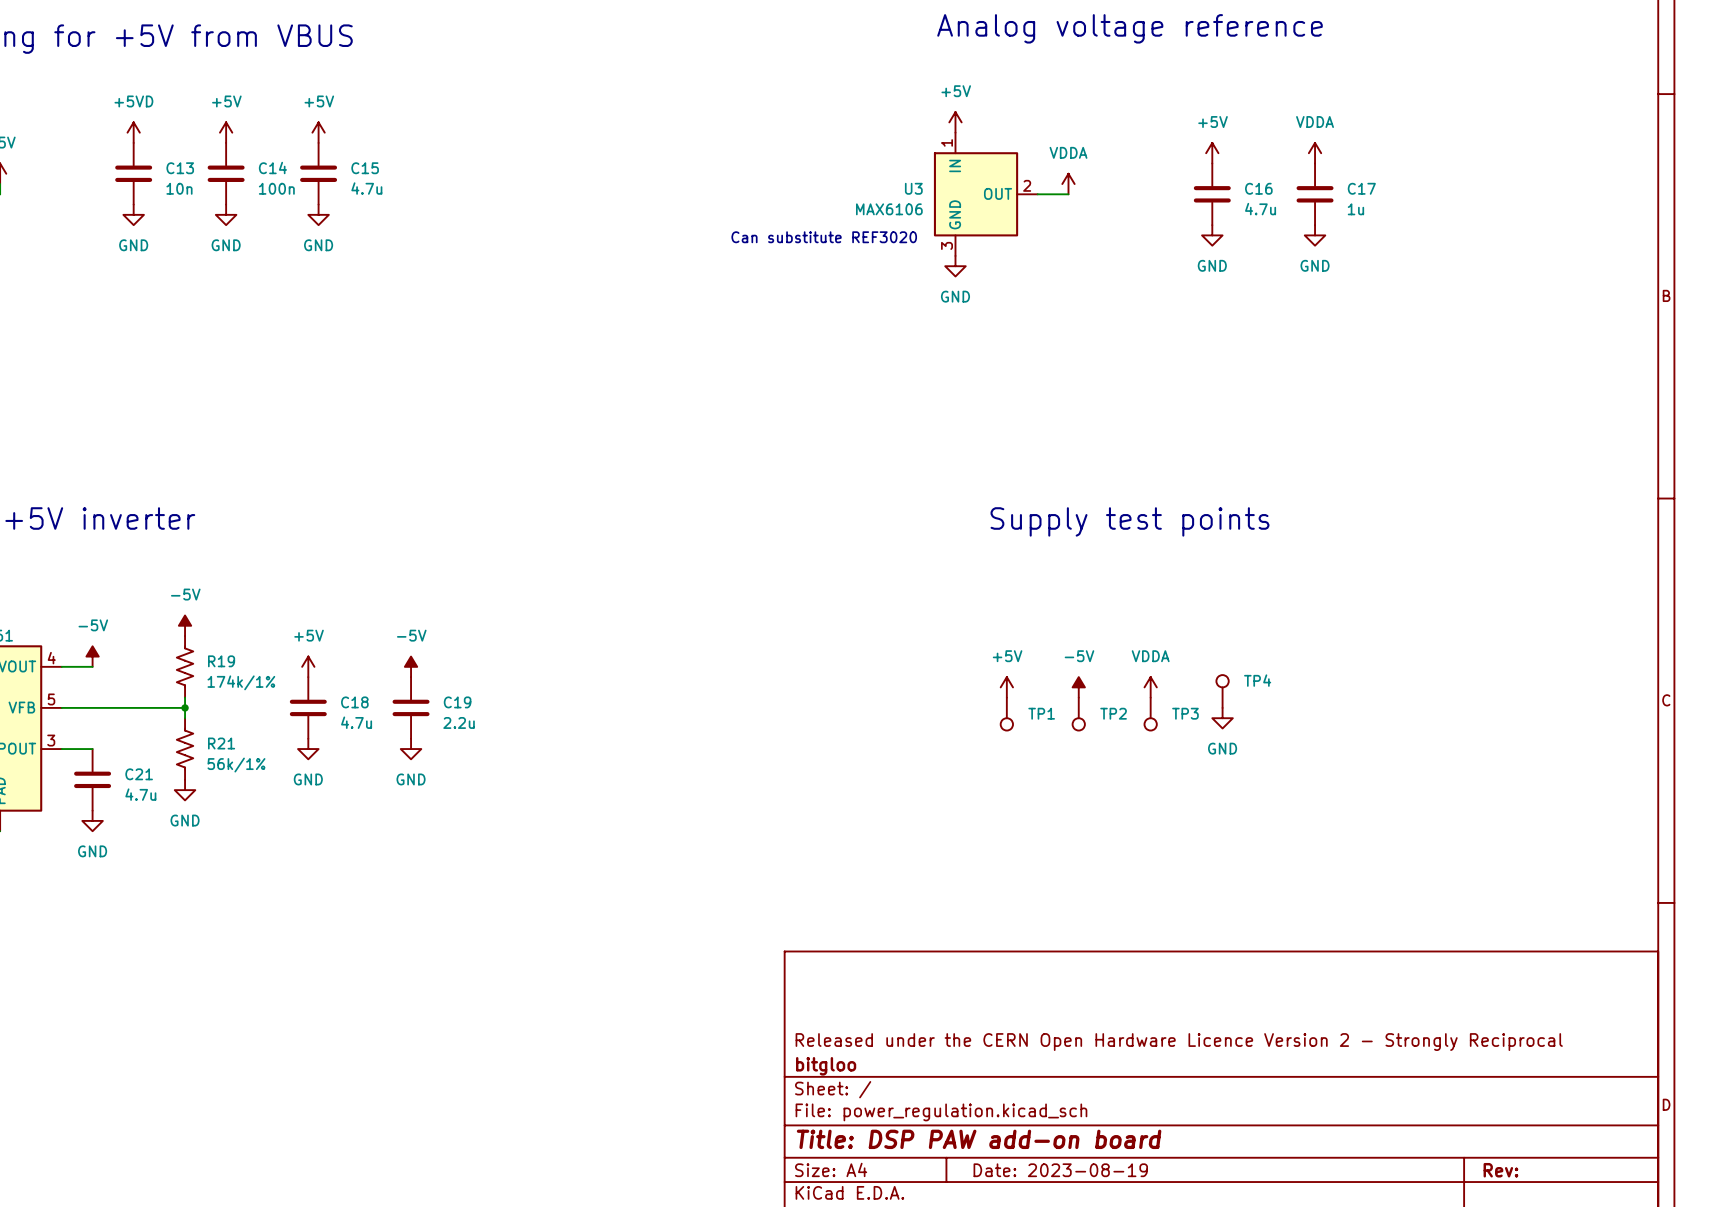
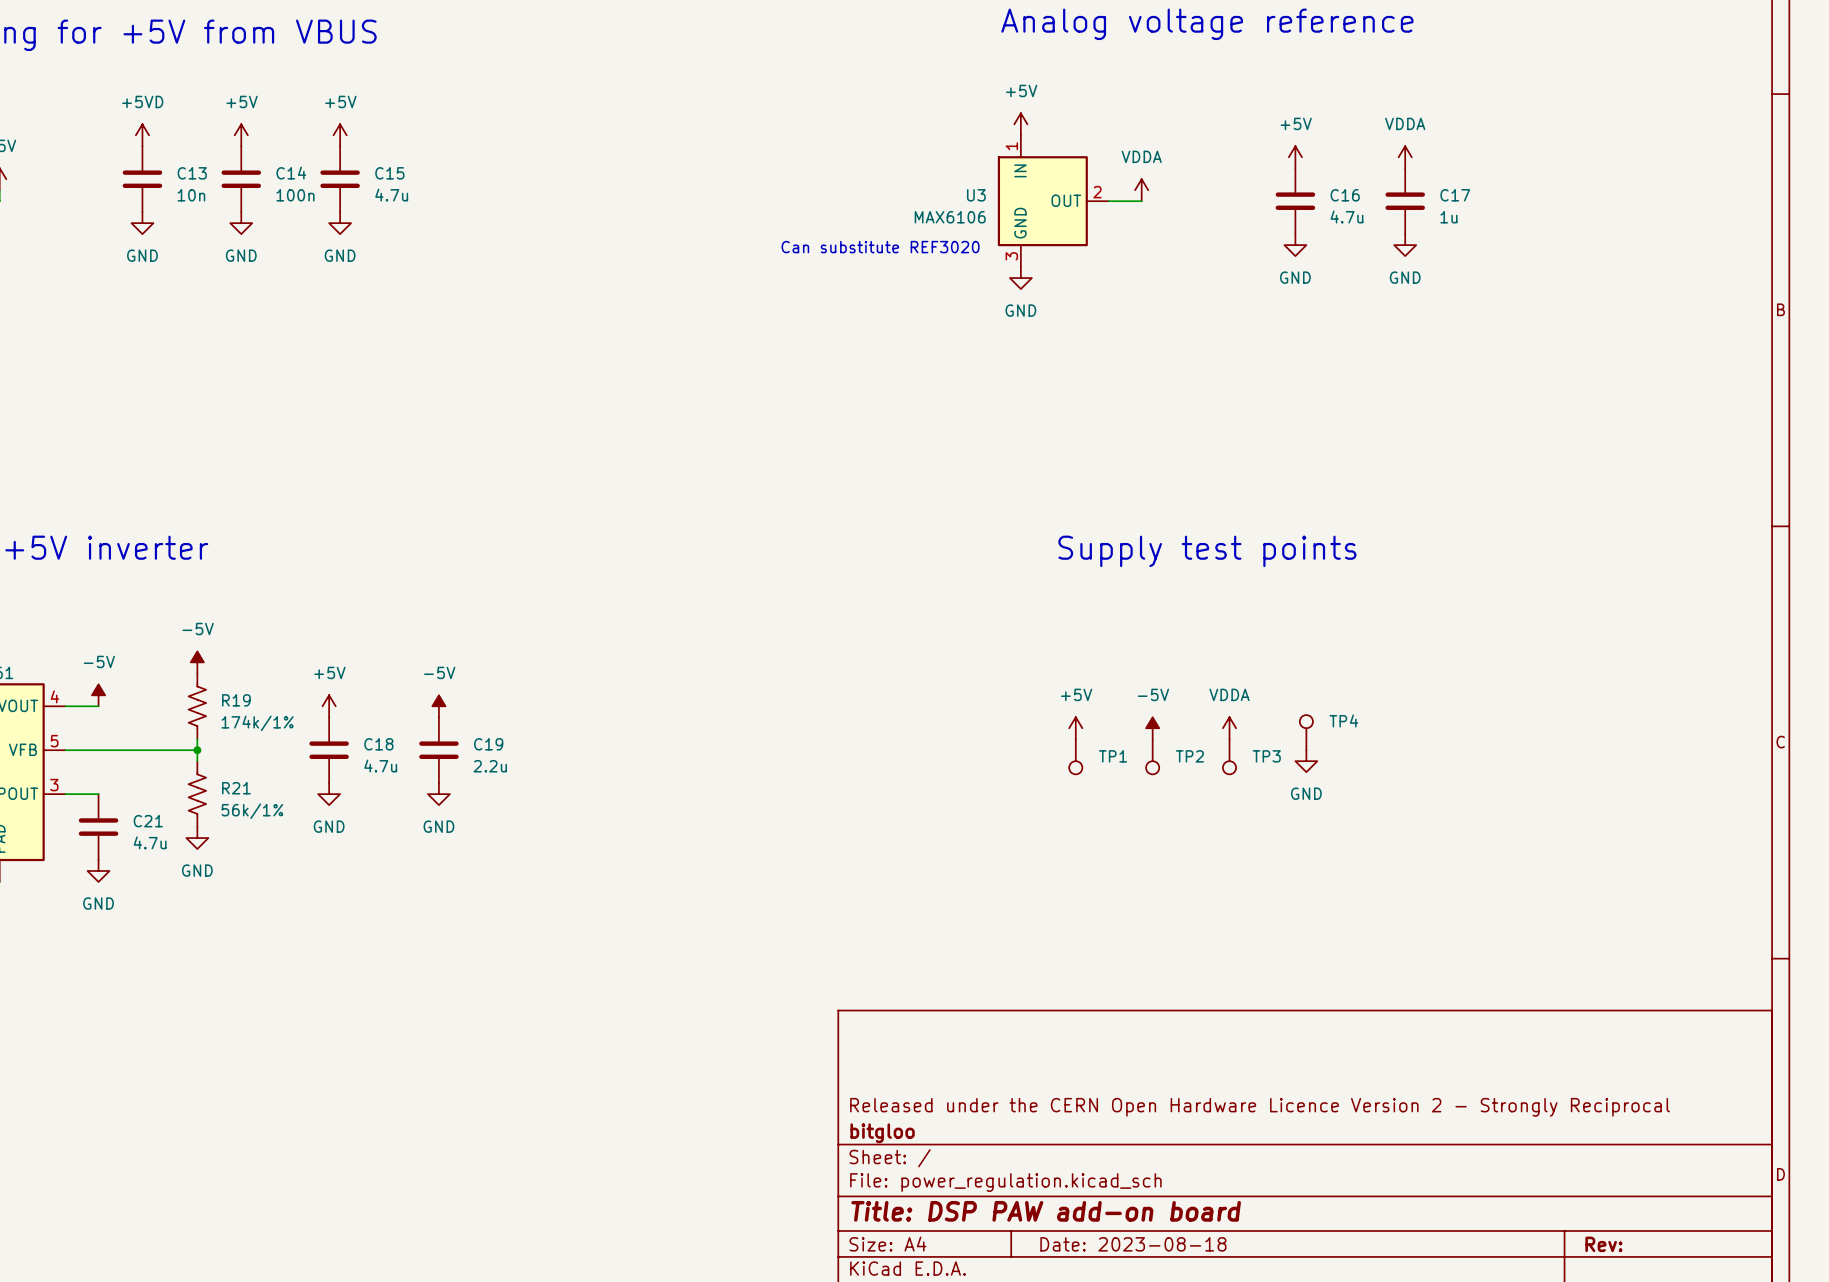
title block: Date: 2023-08-19 (1060, 1170) -> Date: 2023-08-18 (1133, 1244)

